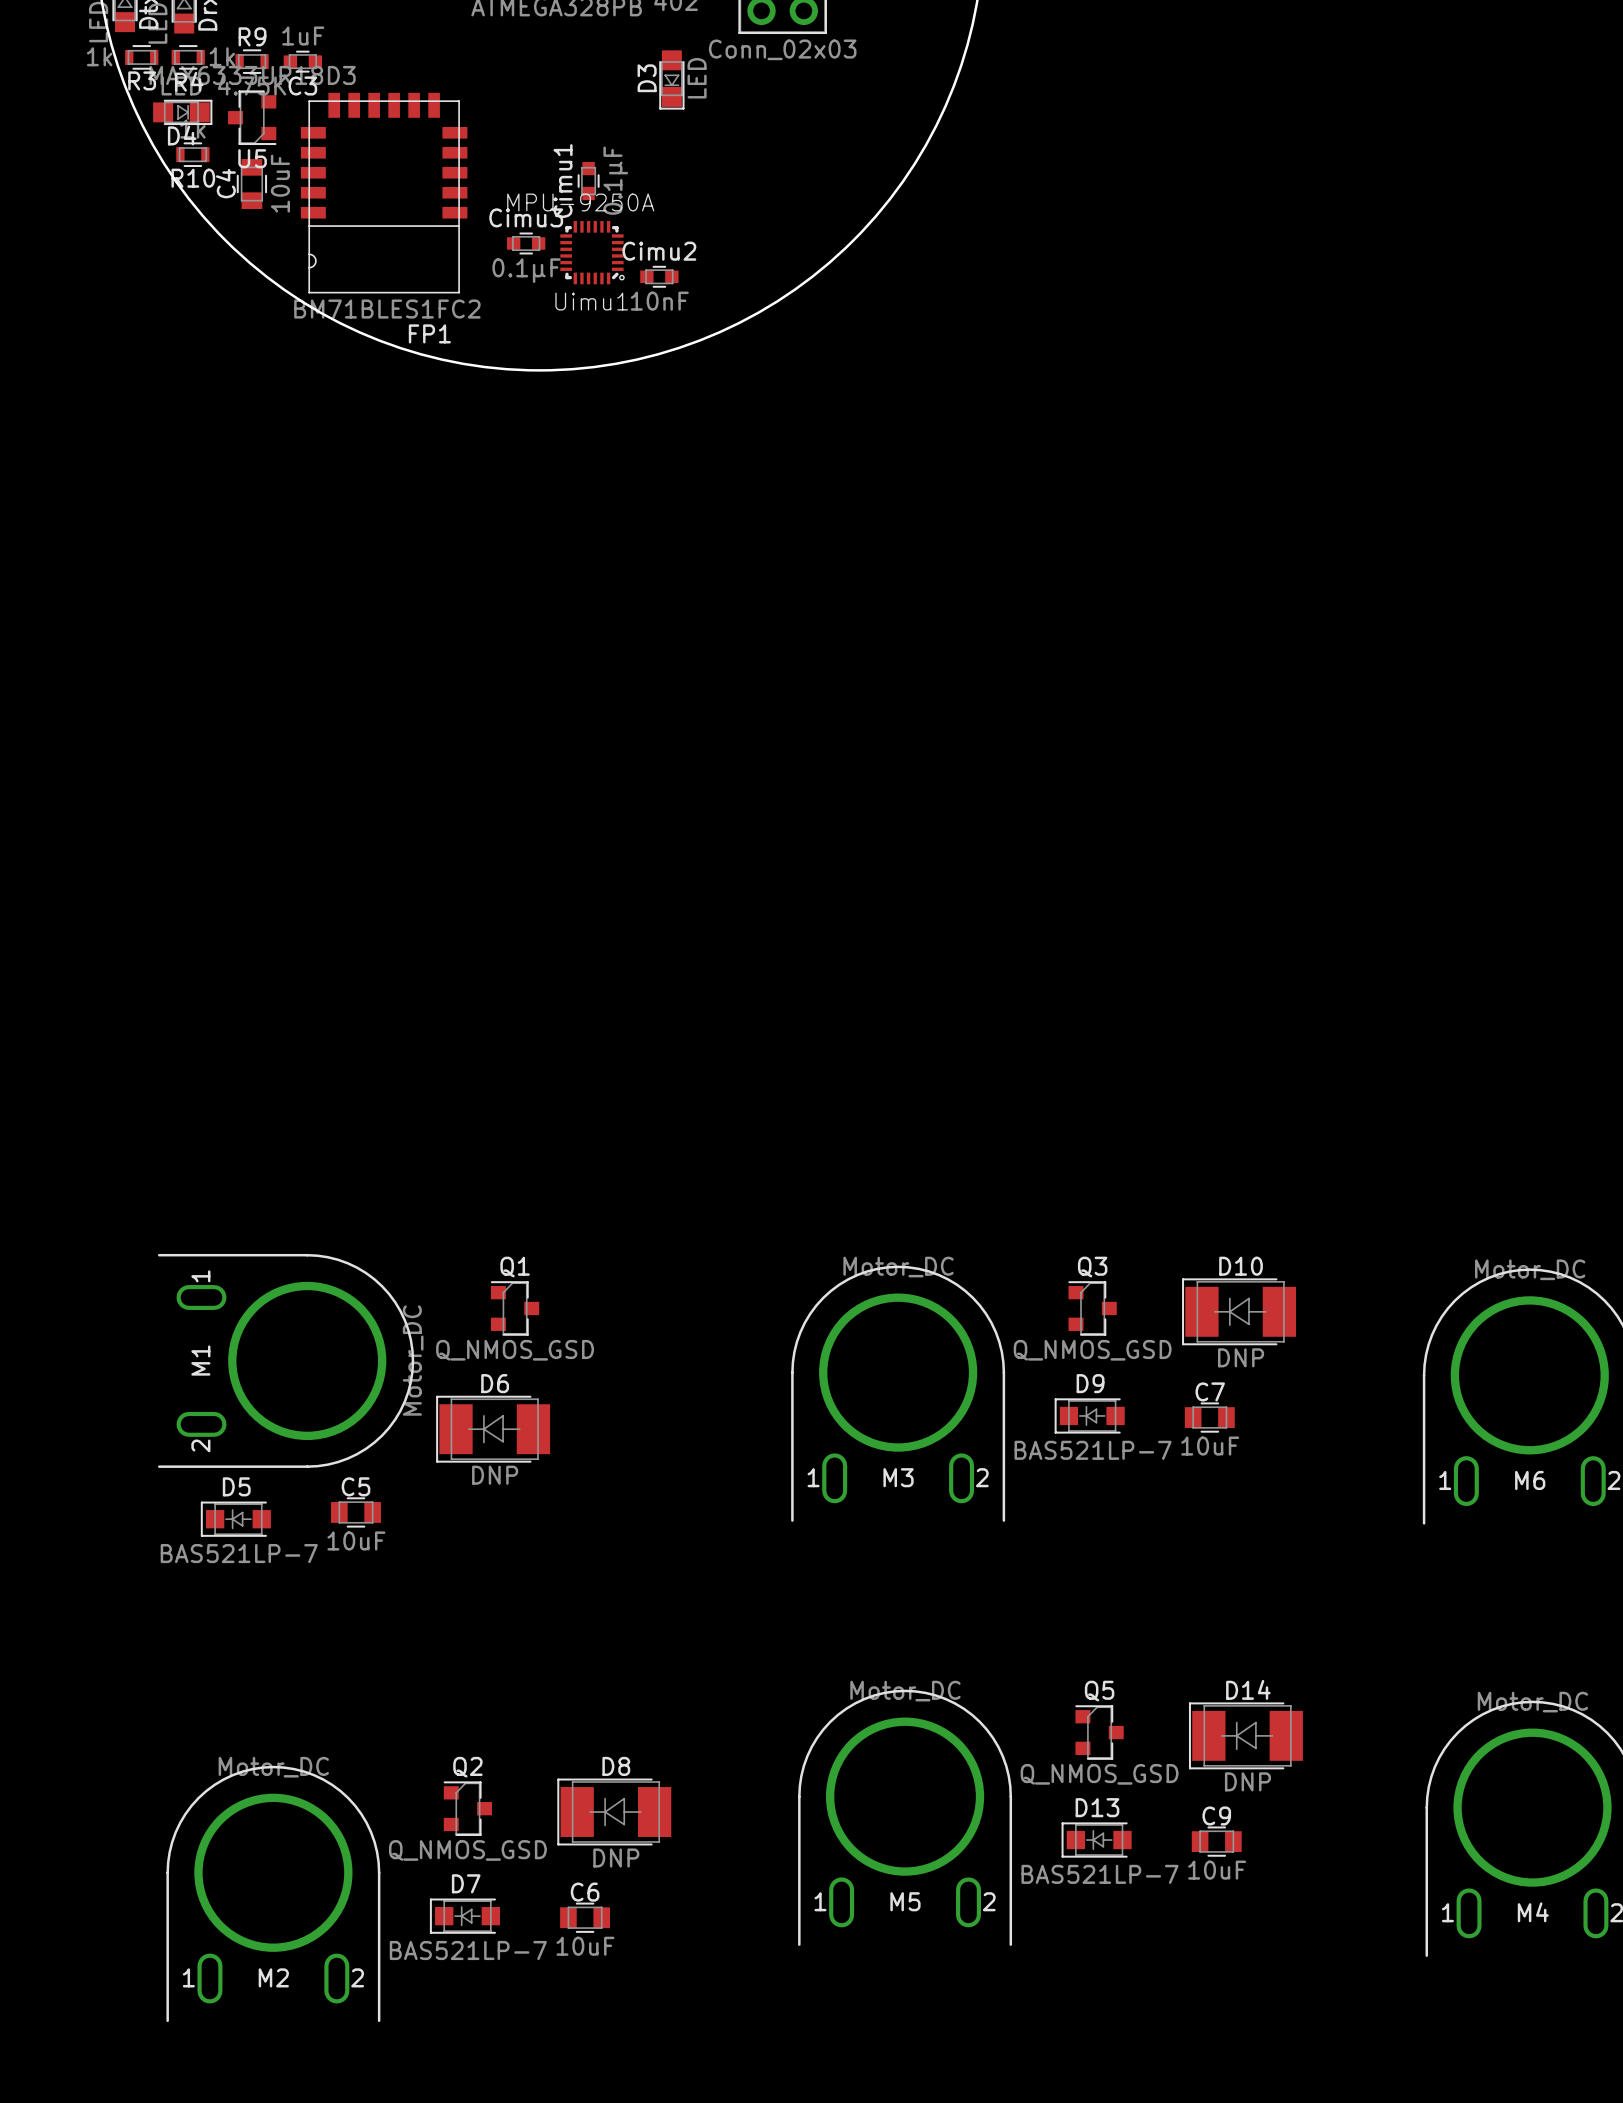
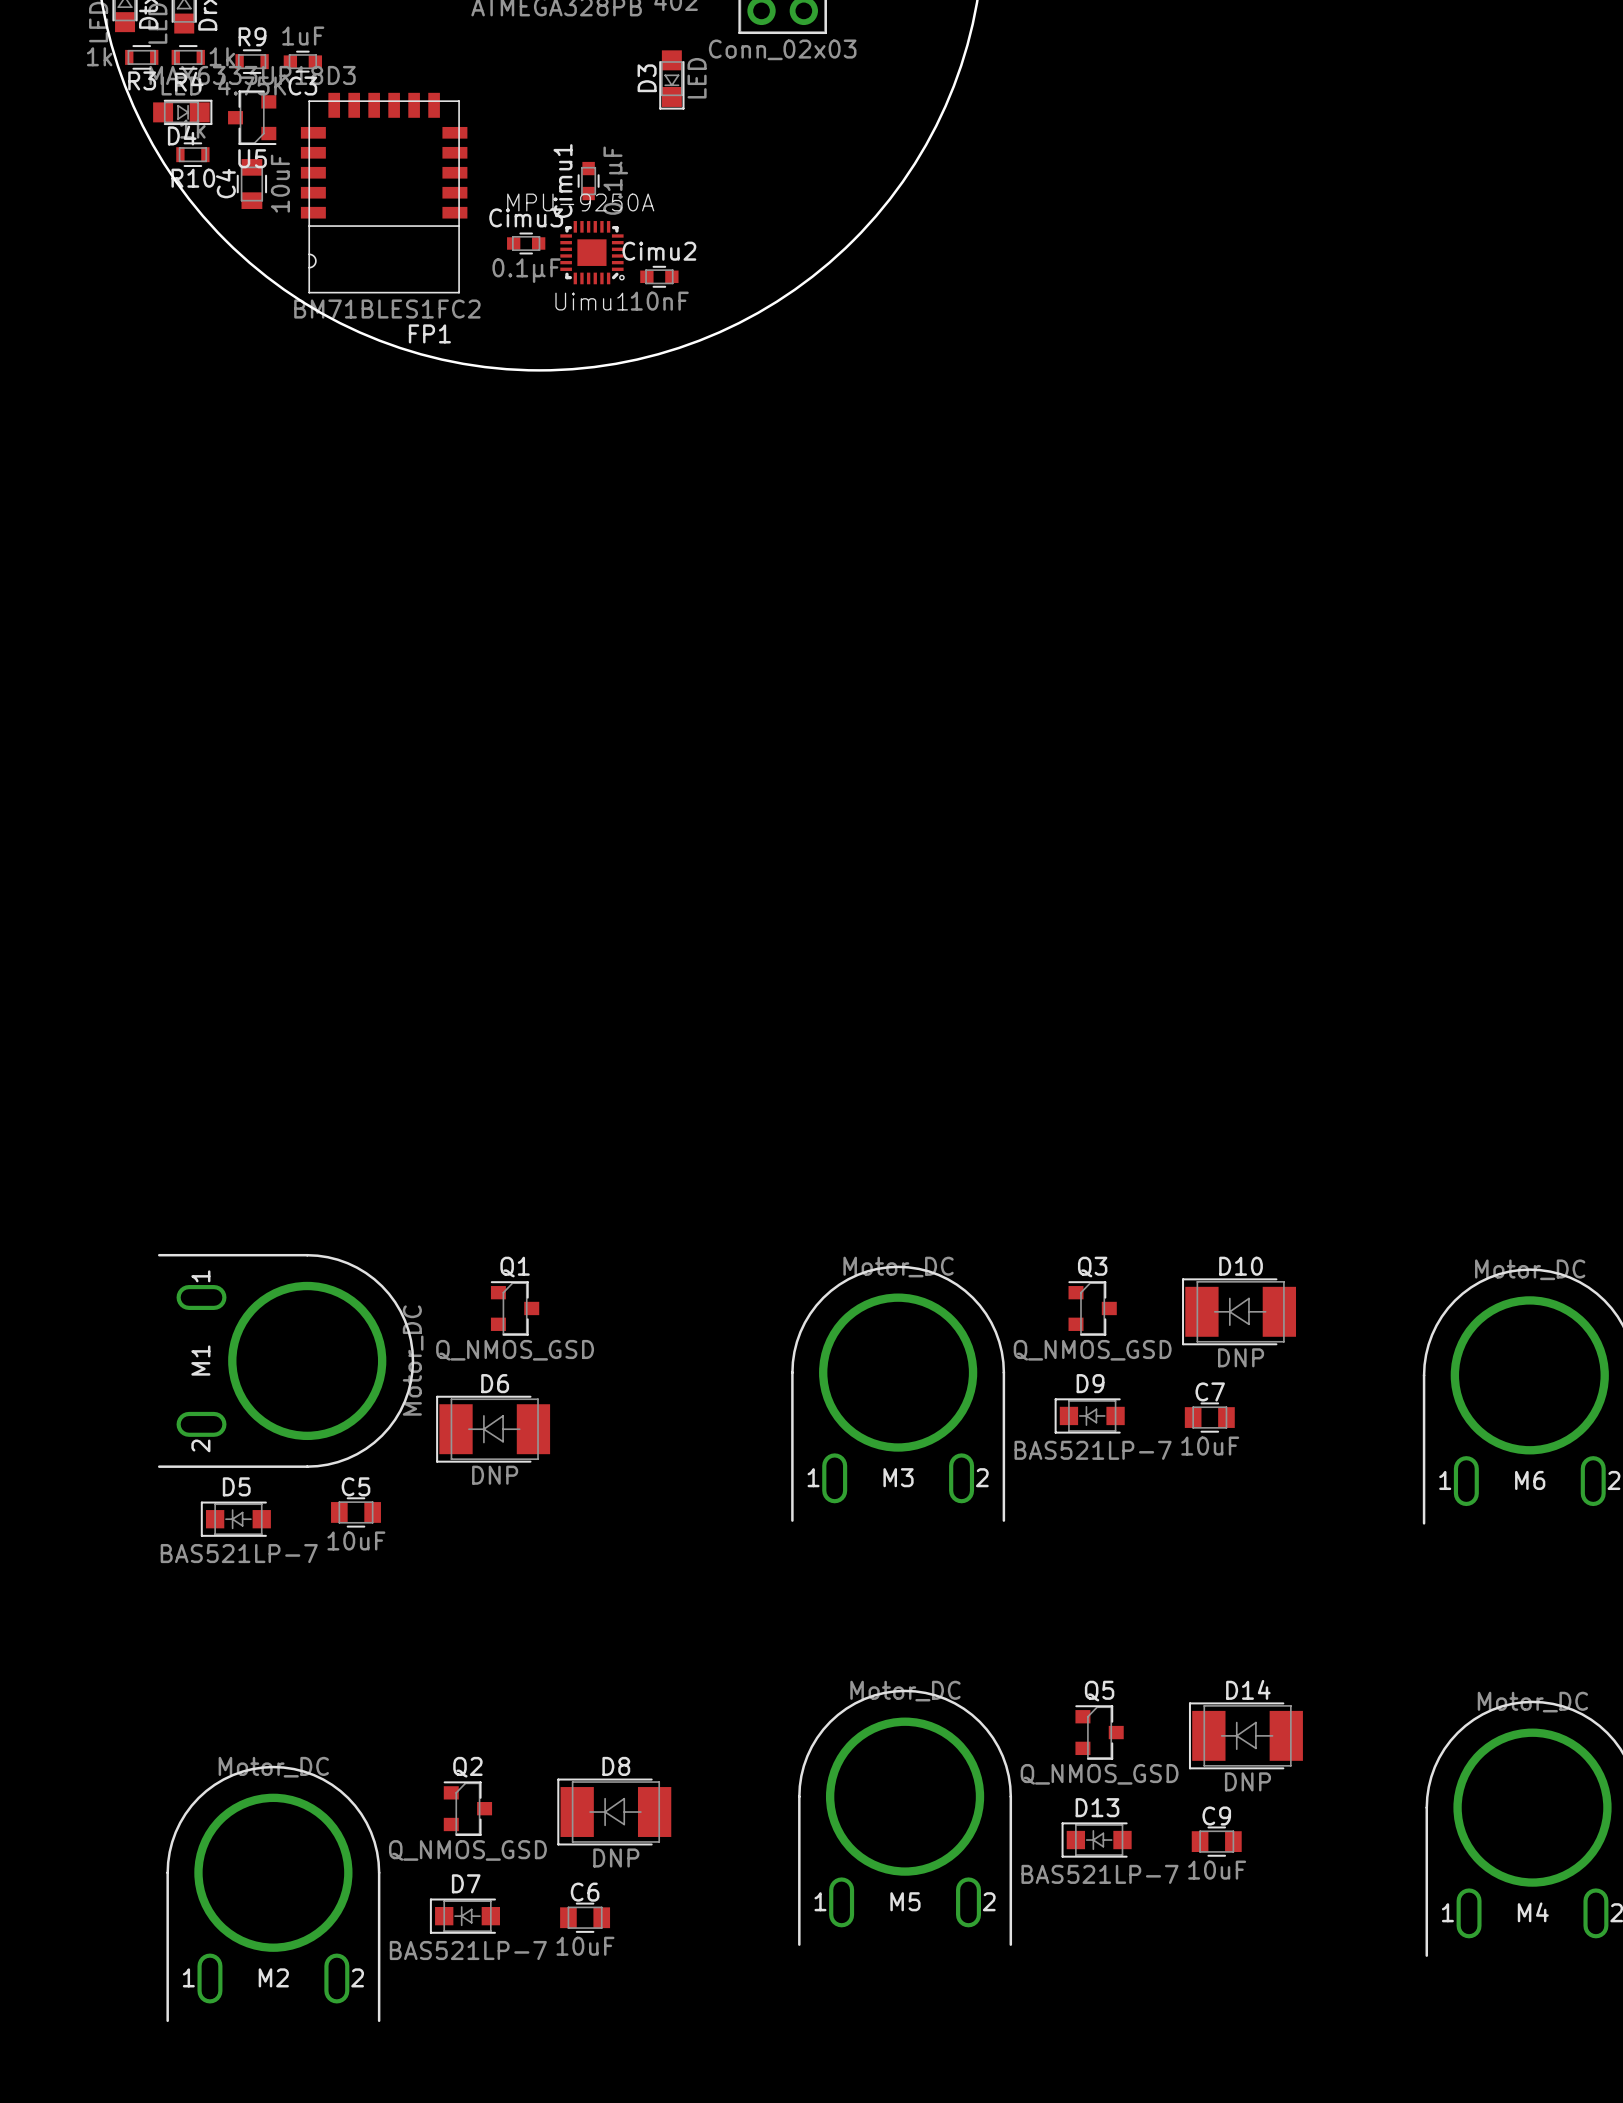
Uimu1 footprint: [560, 221, 625, 285] -> [560, 221, 625, 285]

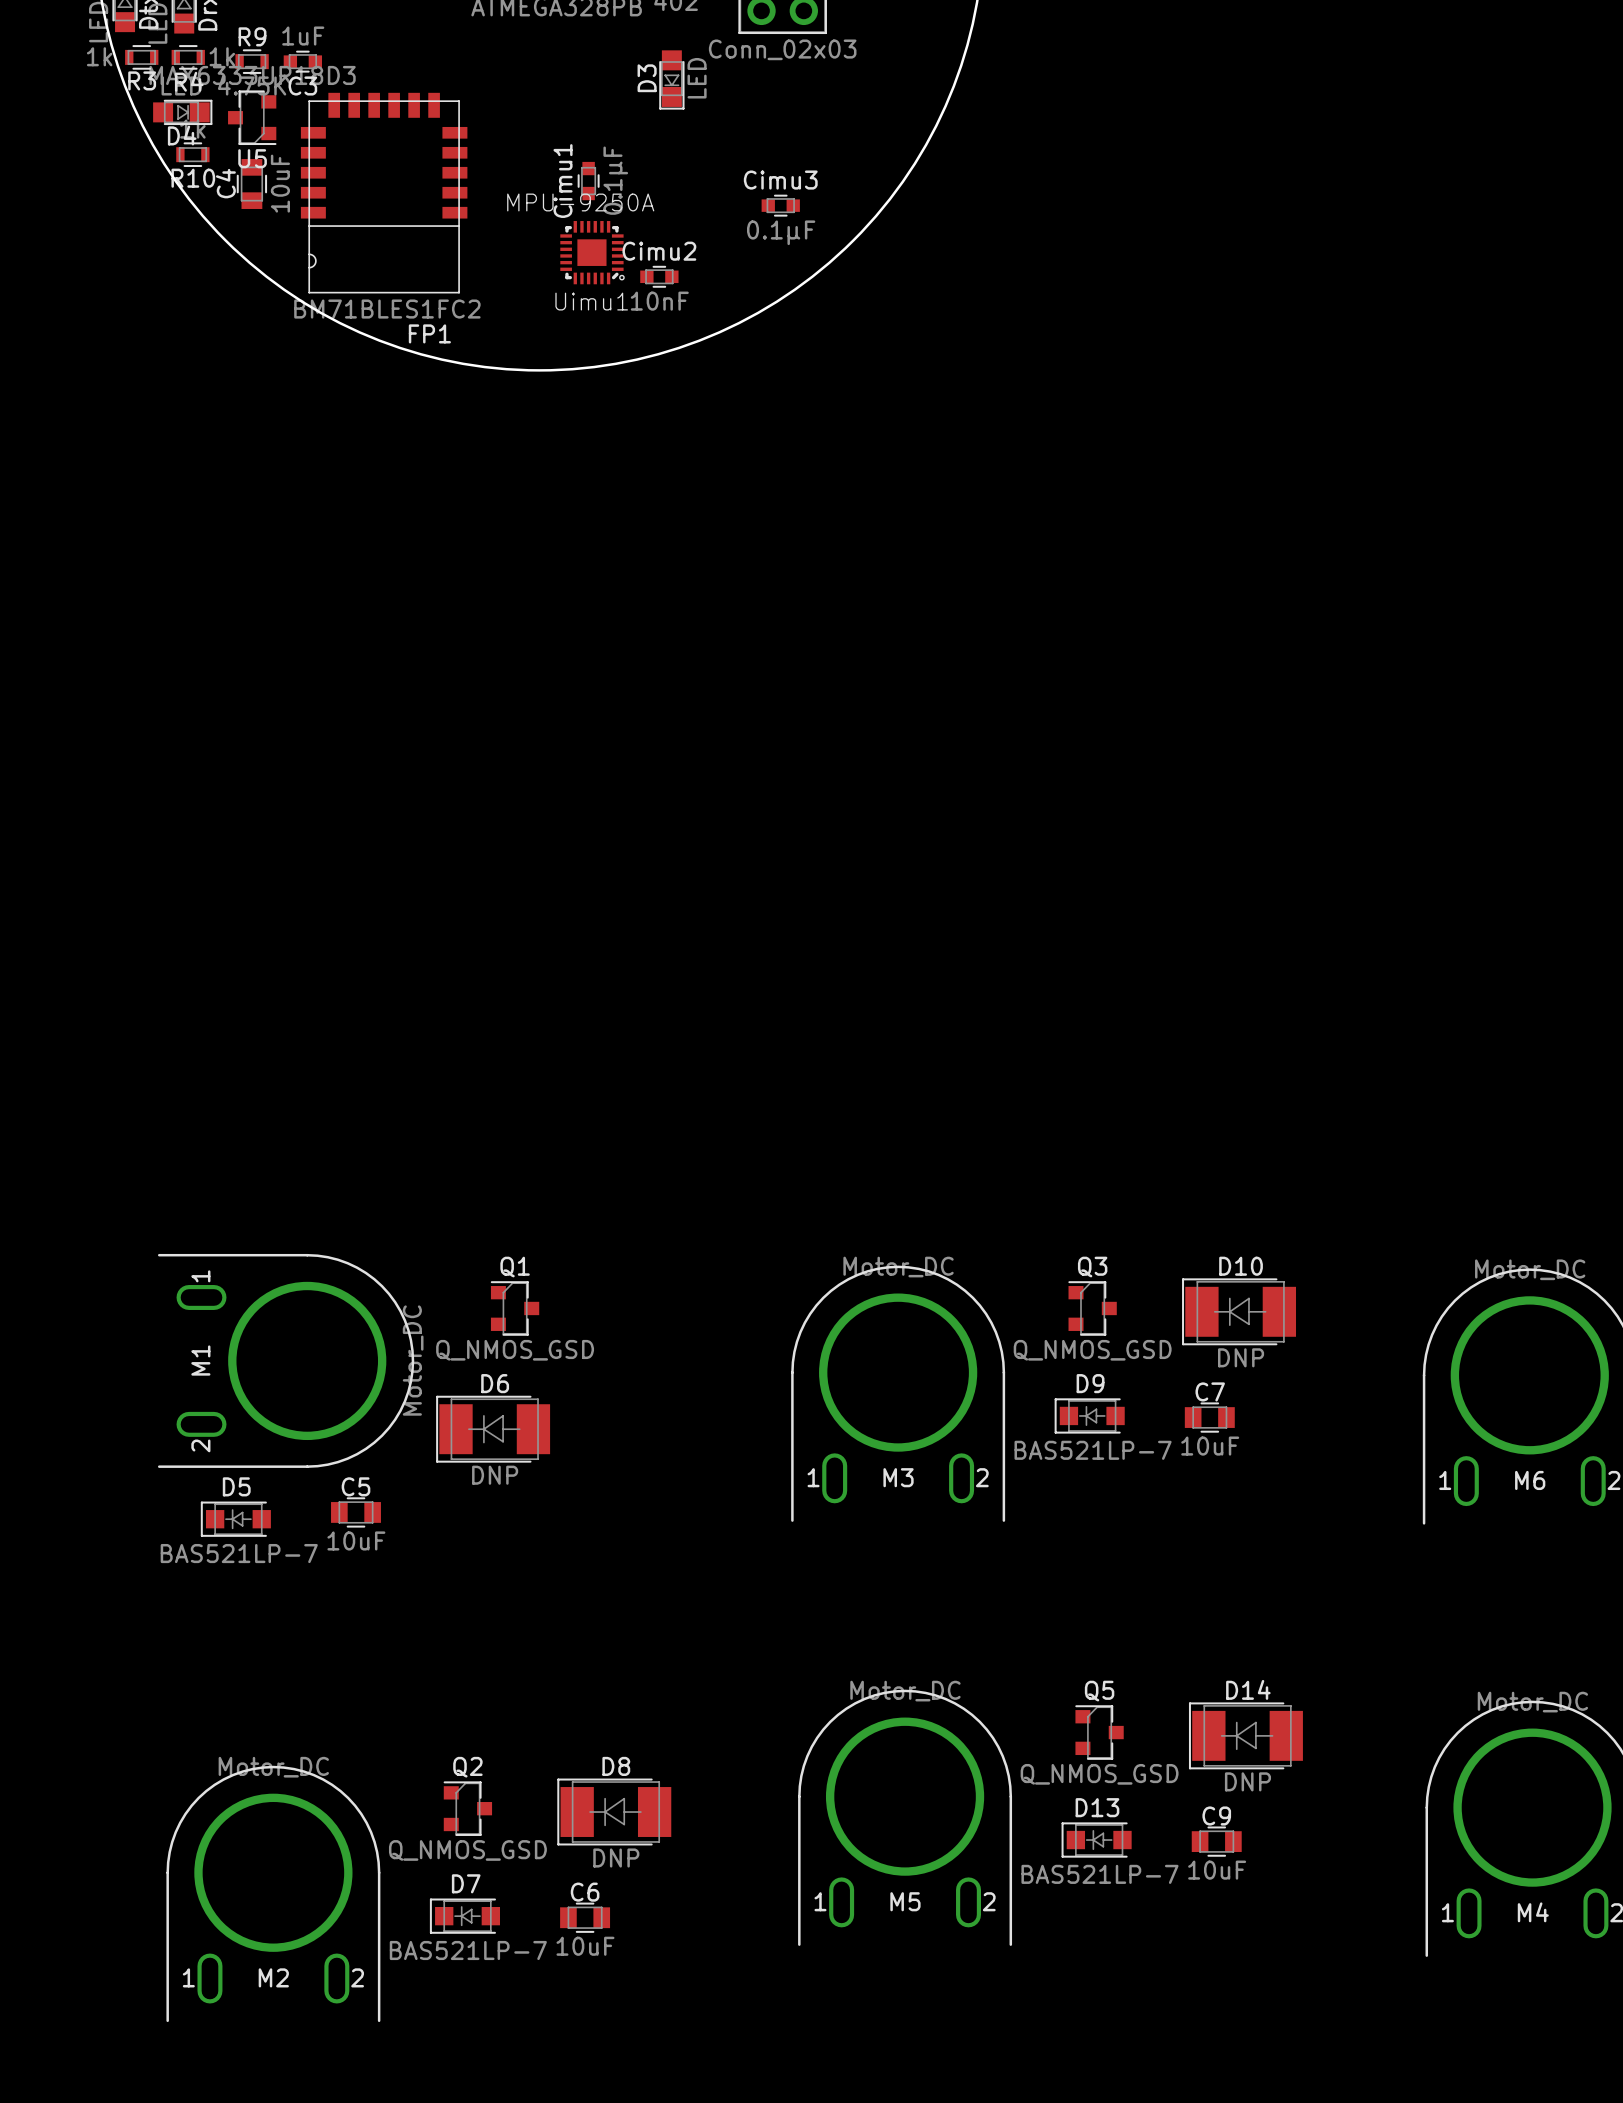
Cimu3 position: (526, 243) -> (780, 205)

